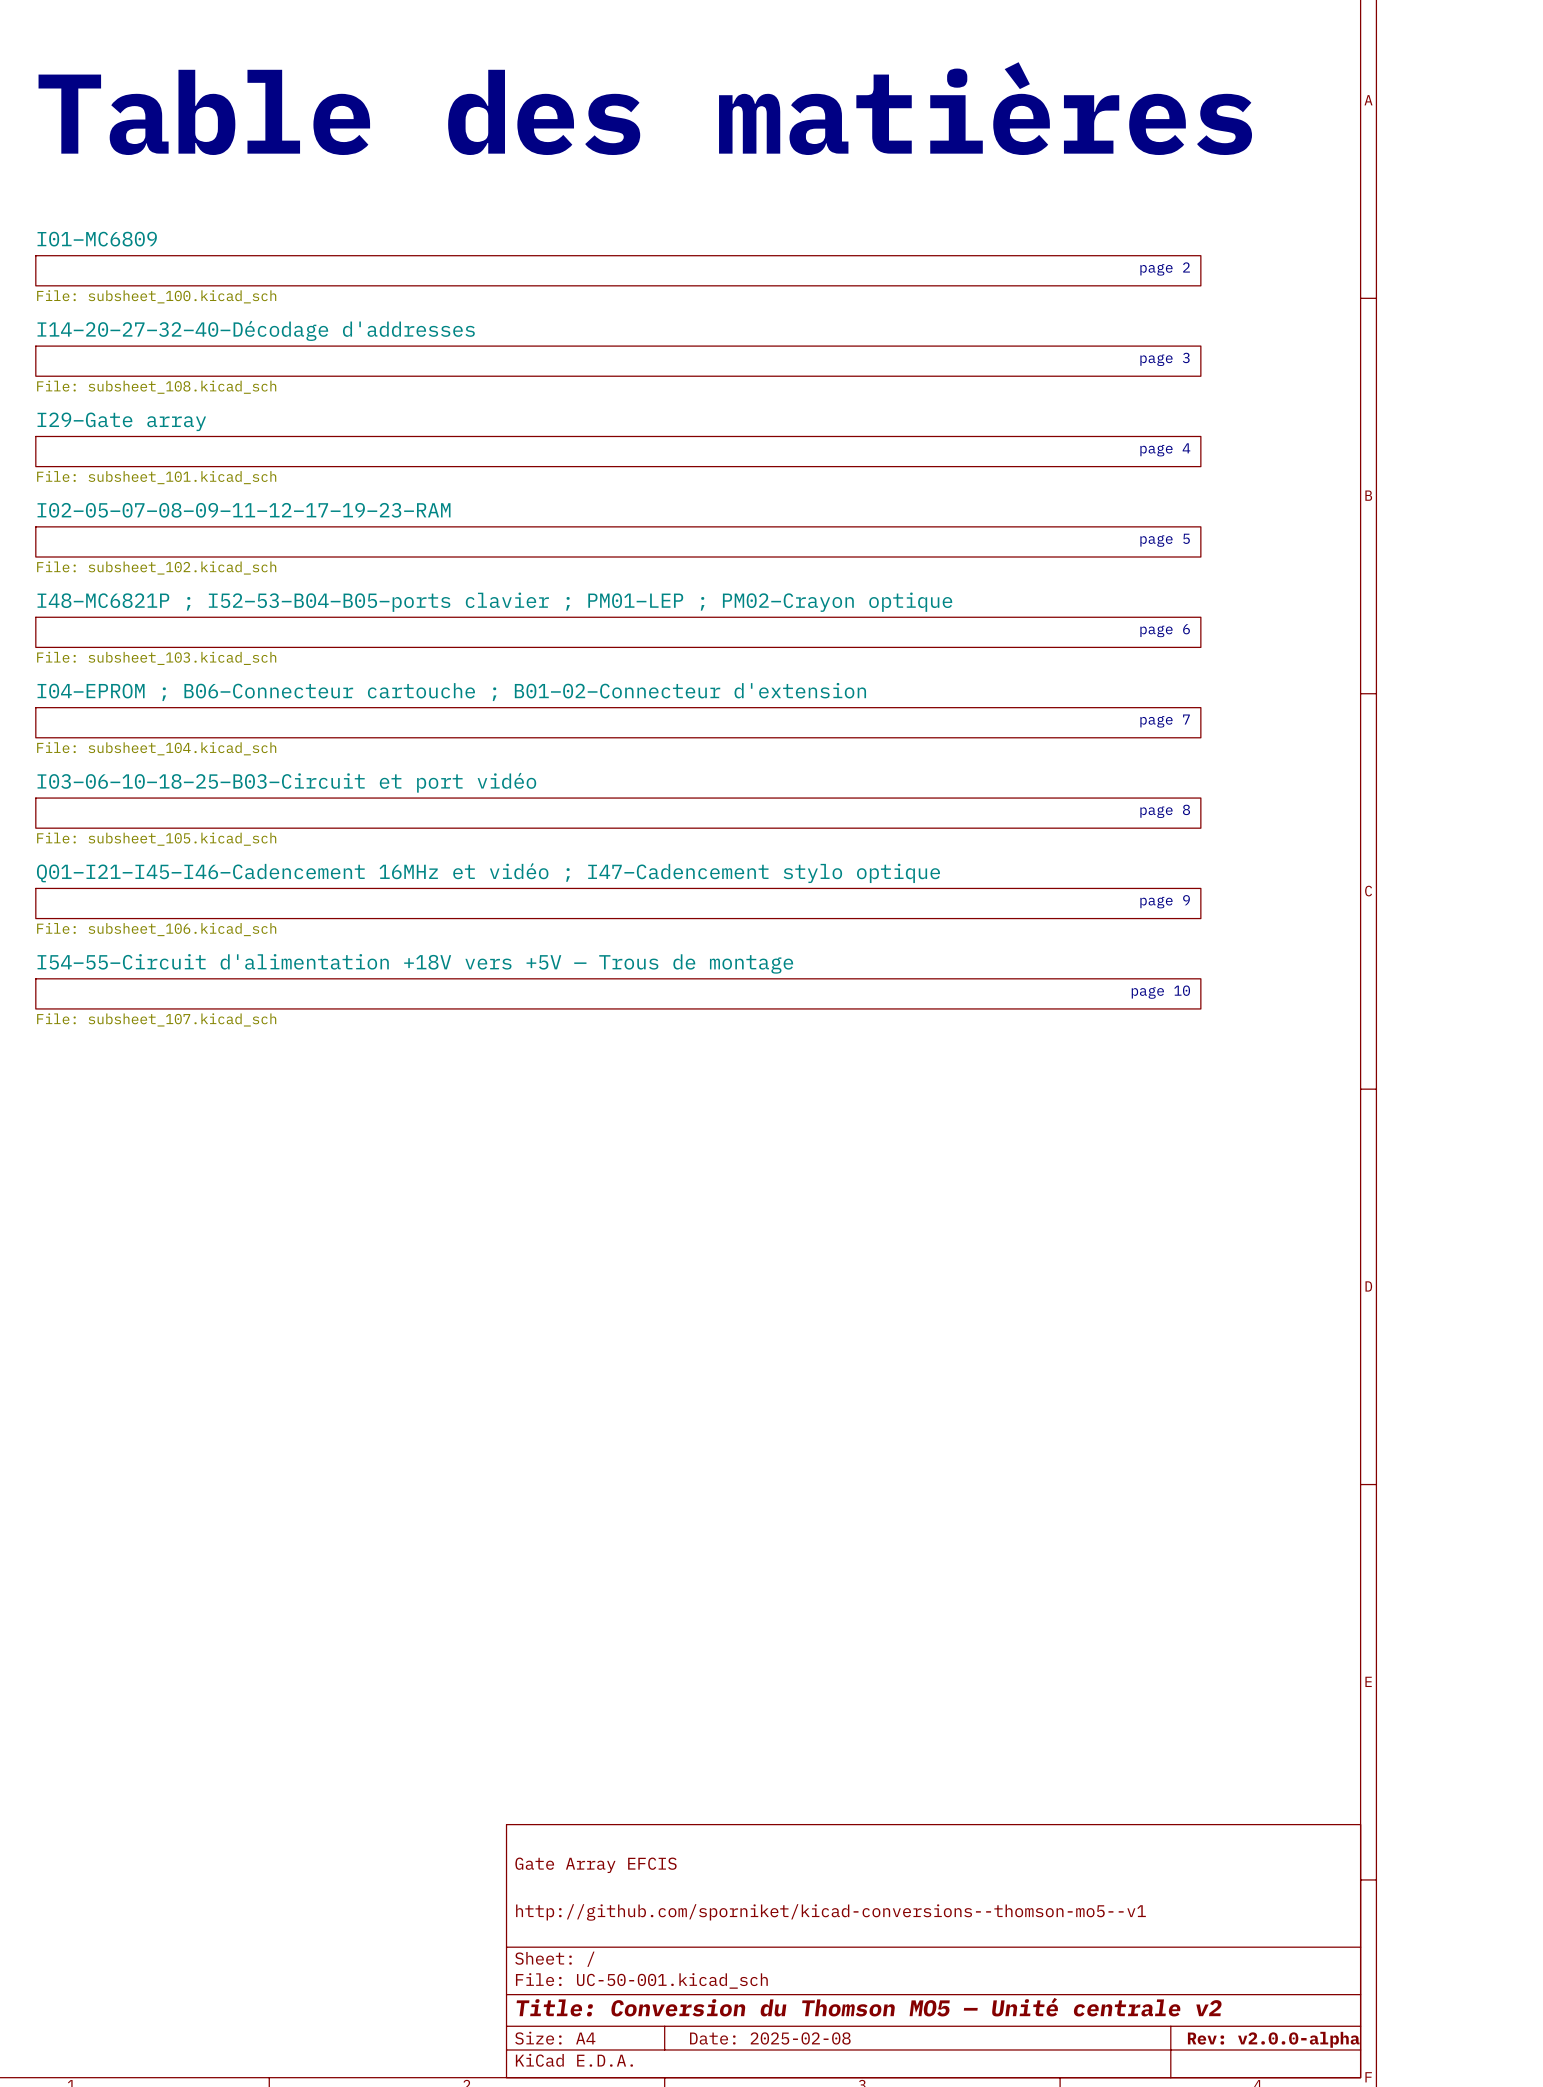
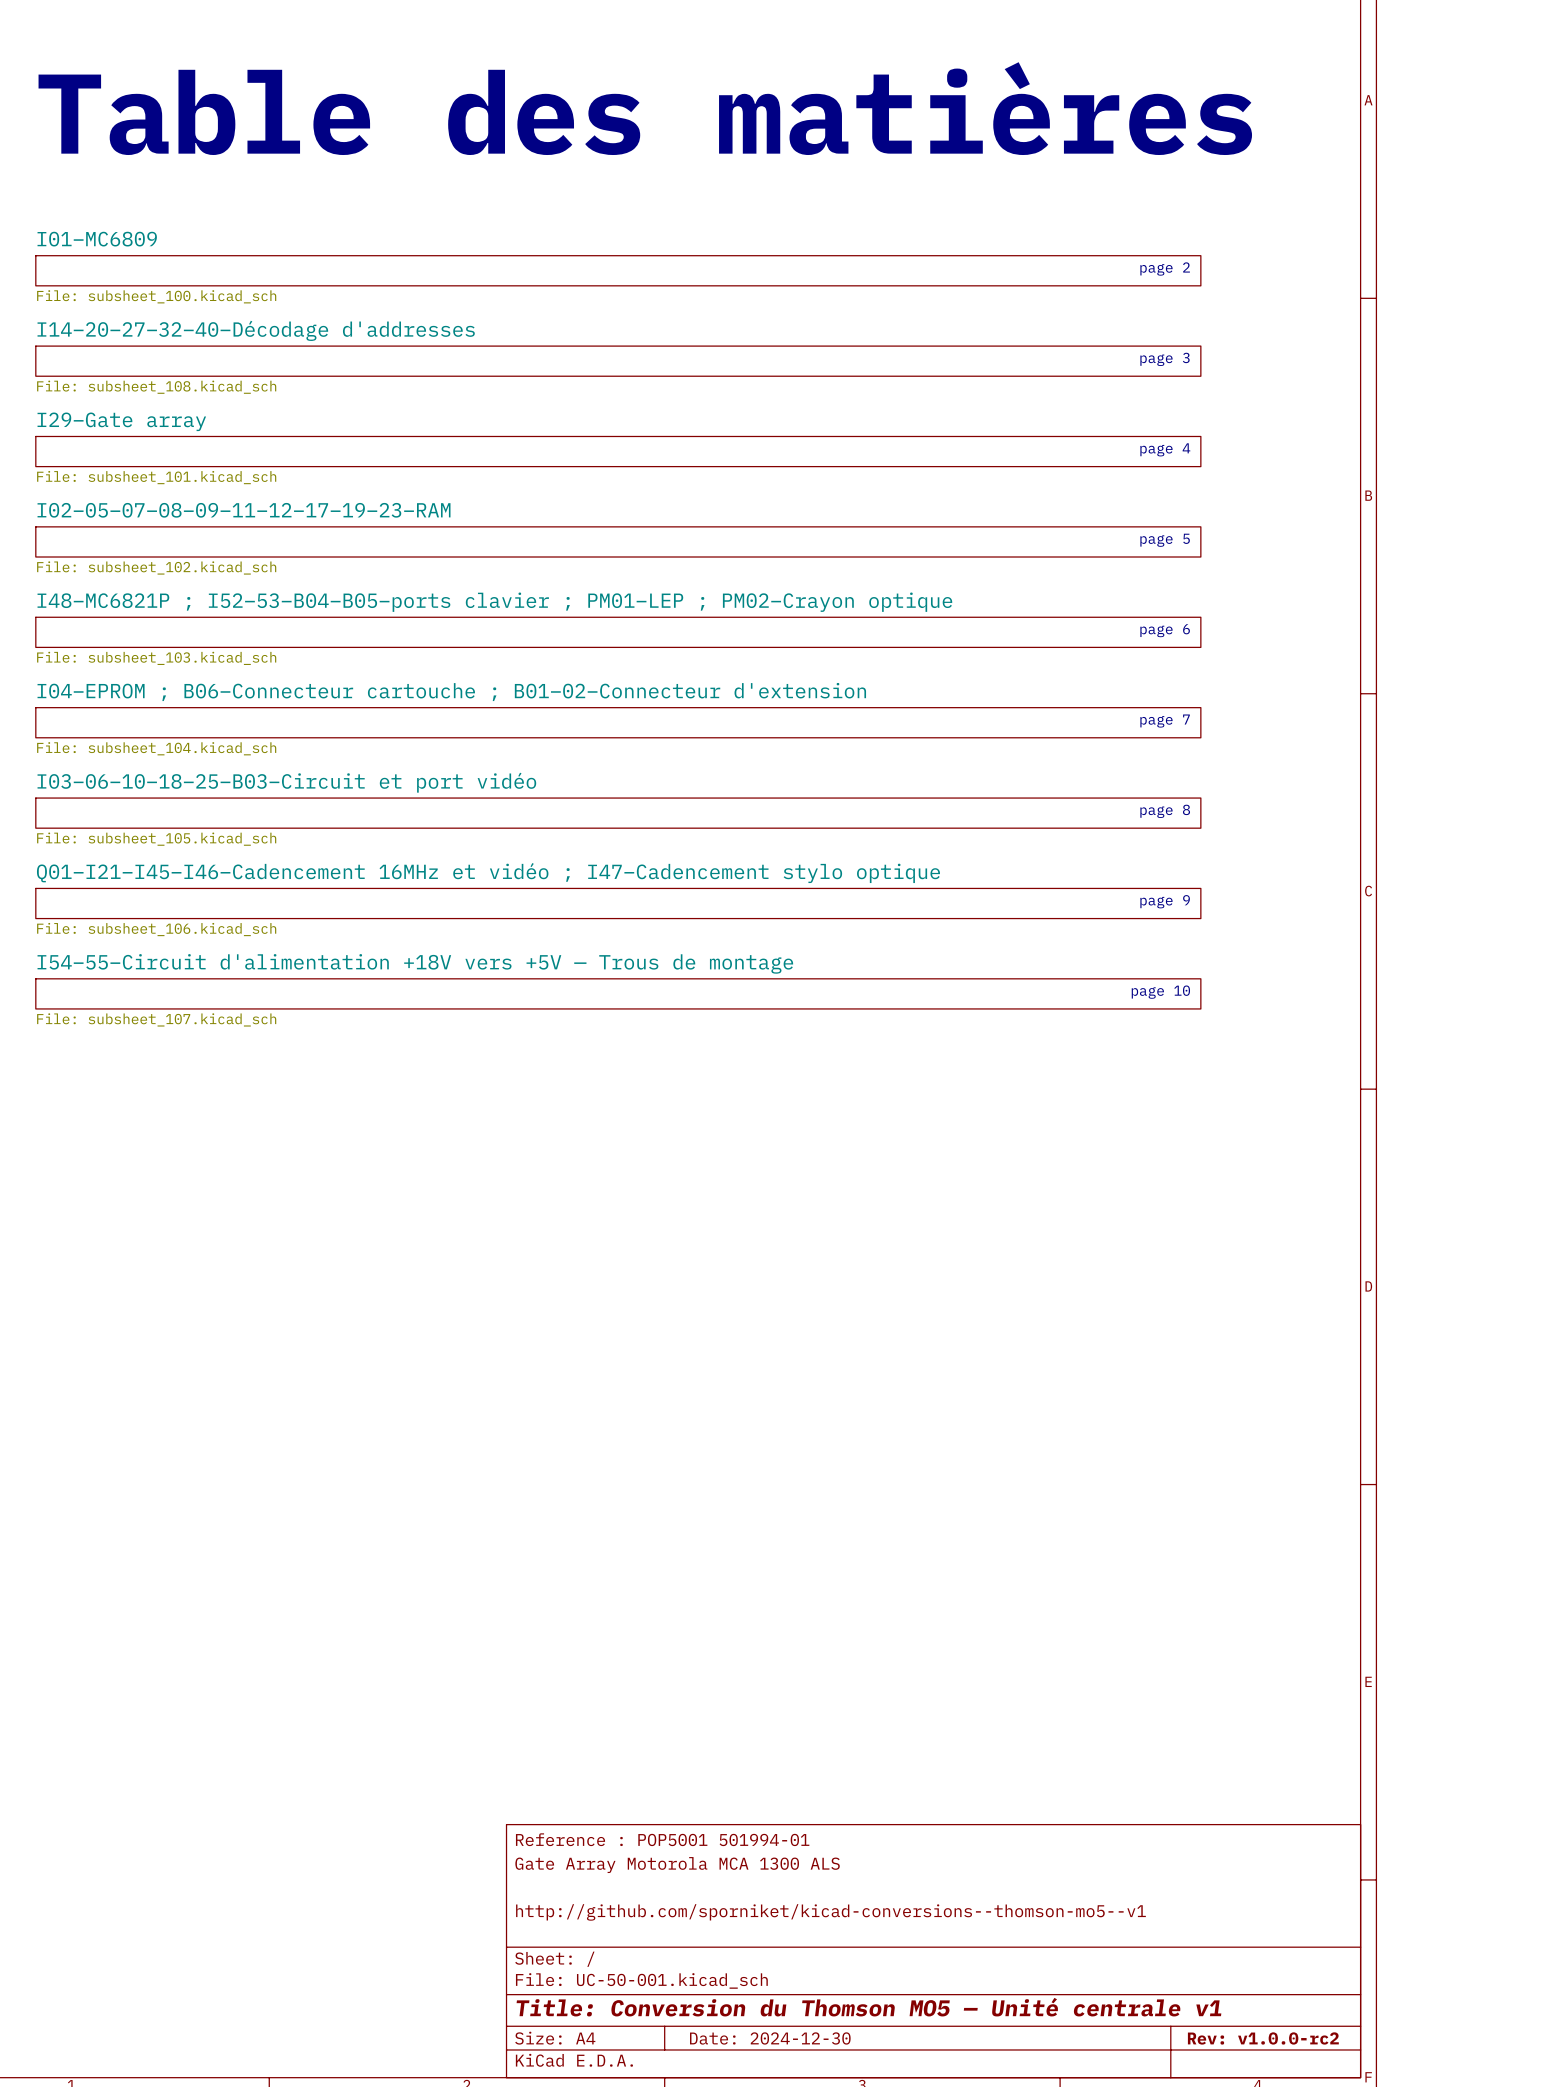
title block: none -> Reference : POP5001 501994-01 (662, 1839)
title block: Gate Array EFCIS (595, 1865) -> Gate Array Motorola MCA 1300 ALS (677, 1865)
title block: Title: Conversion du Thomson MO5 — Unité centrale v2 (869, 2007) -> Title: Conversion du Thomson MO5 — Unité centrale v1 (868, 2007)
title block: Date: 2025-02-08 (770, 2038) -> Date: 2024-12-30 (770, 2038)
title block: Rev: v2.0.0-alpha (1273, 2039) -> Rev: v1.0.0-rc2 (1263, 2038)

